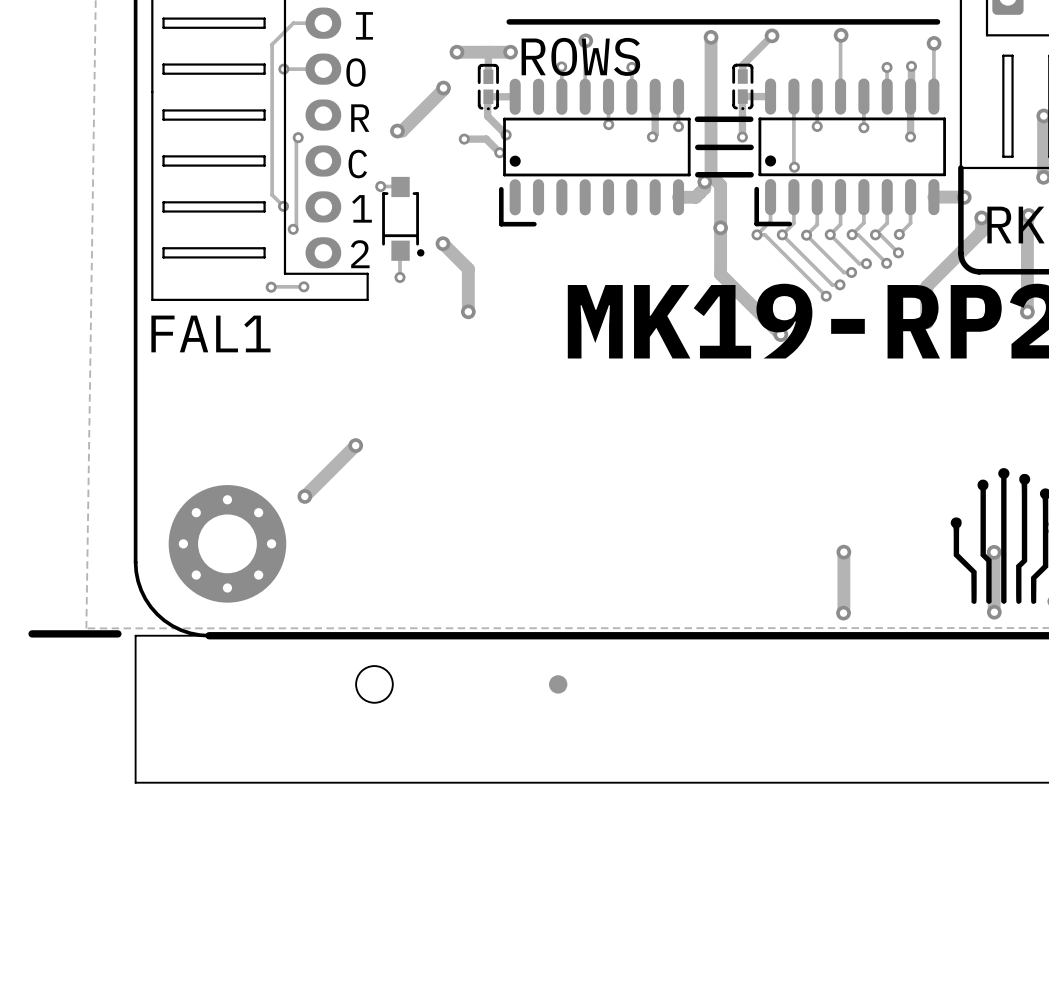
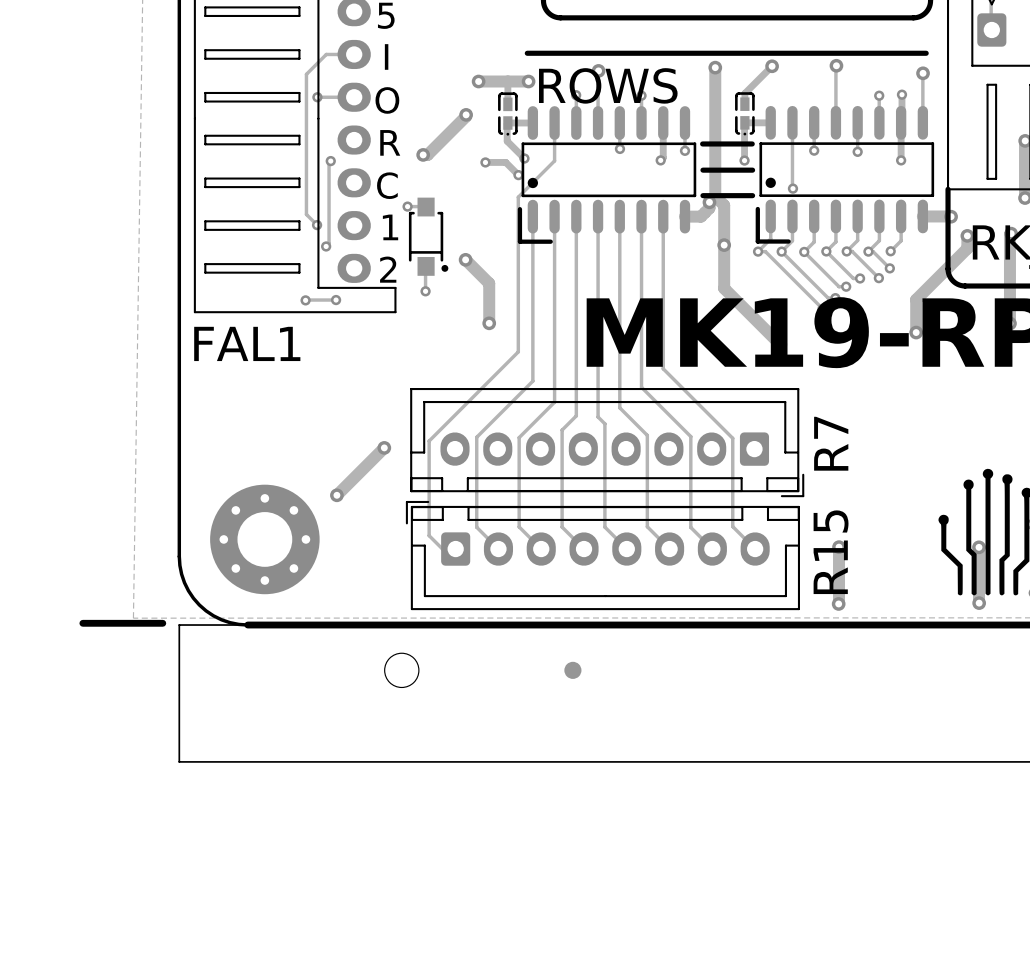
track: none -> (554, 123) (554, 160) (518, 197) (518, 351) (429, 441) (429, 535) (442, 549) (455, 549)
track: none -> (532, 216) (532, 381) (476, 437) (476, 527) (498, 549)
track: none -> (554, 216) (554, 402) (519, 437) (519, 526) (541, 549)
track: none -> (576, 216) (576, 415) (562, 430) (562, 527) (584, 549)
track: none -> (598, 216) (598, 417) (604, 423) (604, 527) (626, 549)
track: none -> (619, 216) (619, 407) (647, 435) (647, 526) (669, 549)
track: none -> (641, 216) (641, 387) (690, 436) (690, 527) (712, 549)
track: none -> (663, 216) (663, 368) (732, 438) (732, 526) (755, 549)
part: none -> (607, 442)
text: none -> R7 (831, 443)
text: none -> R15 (831, 552)
part: none -> (602, 555)

